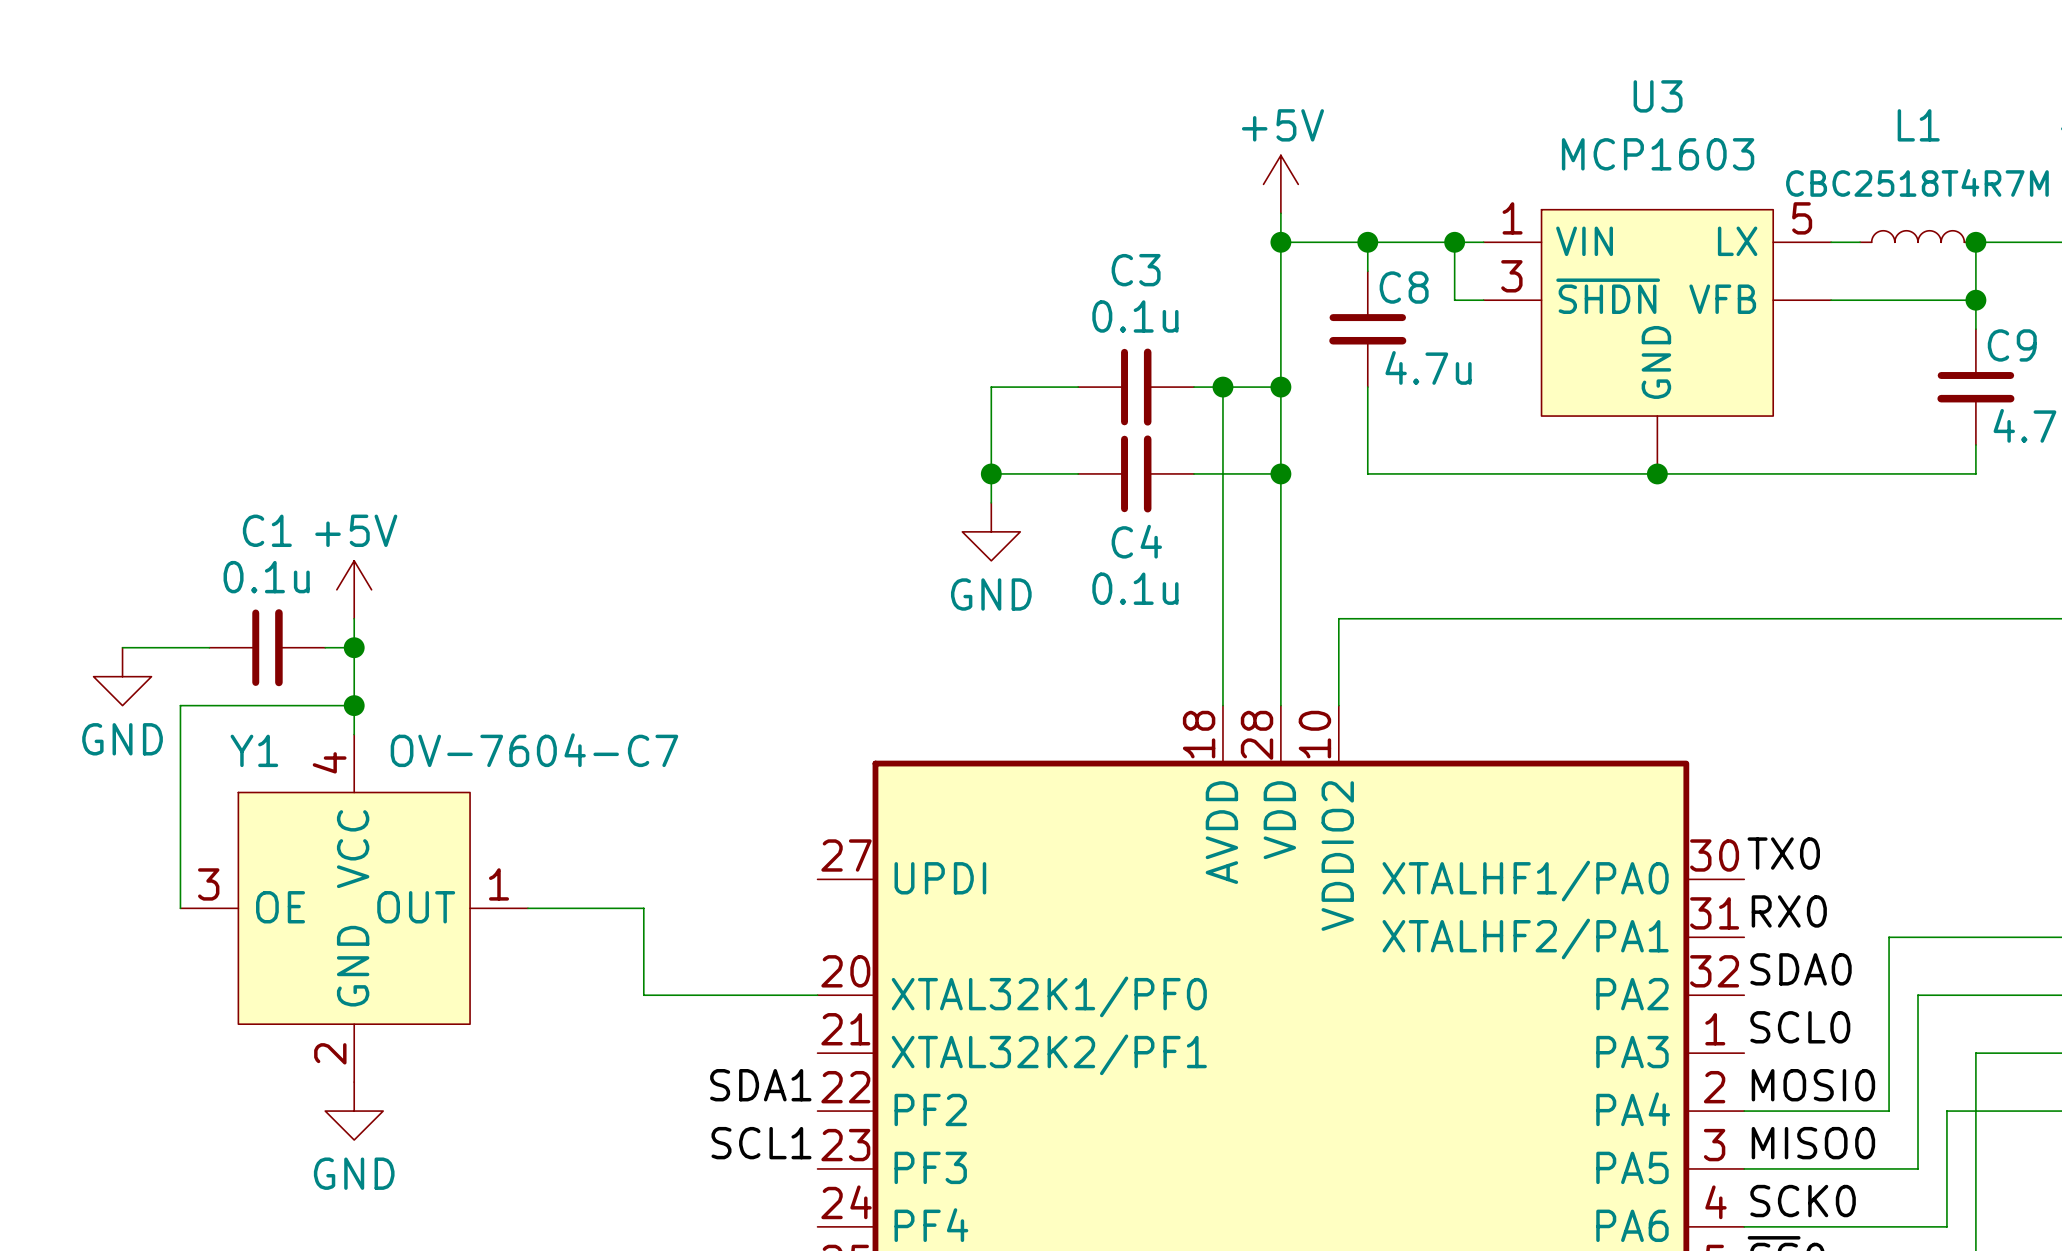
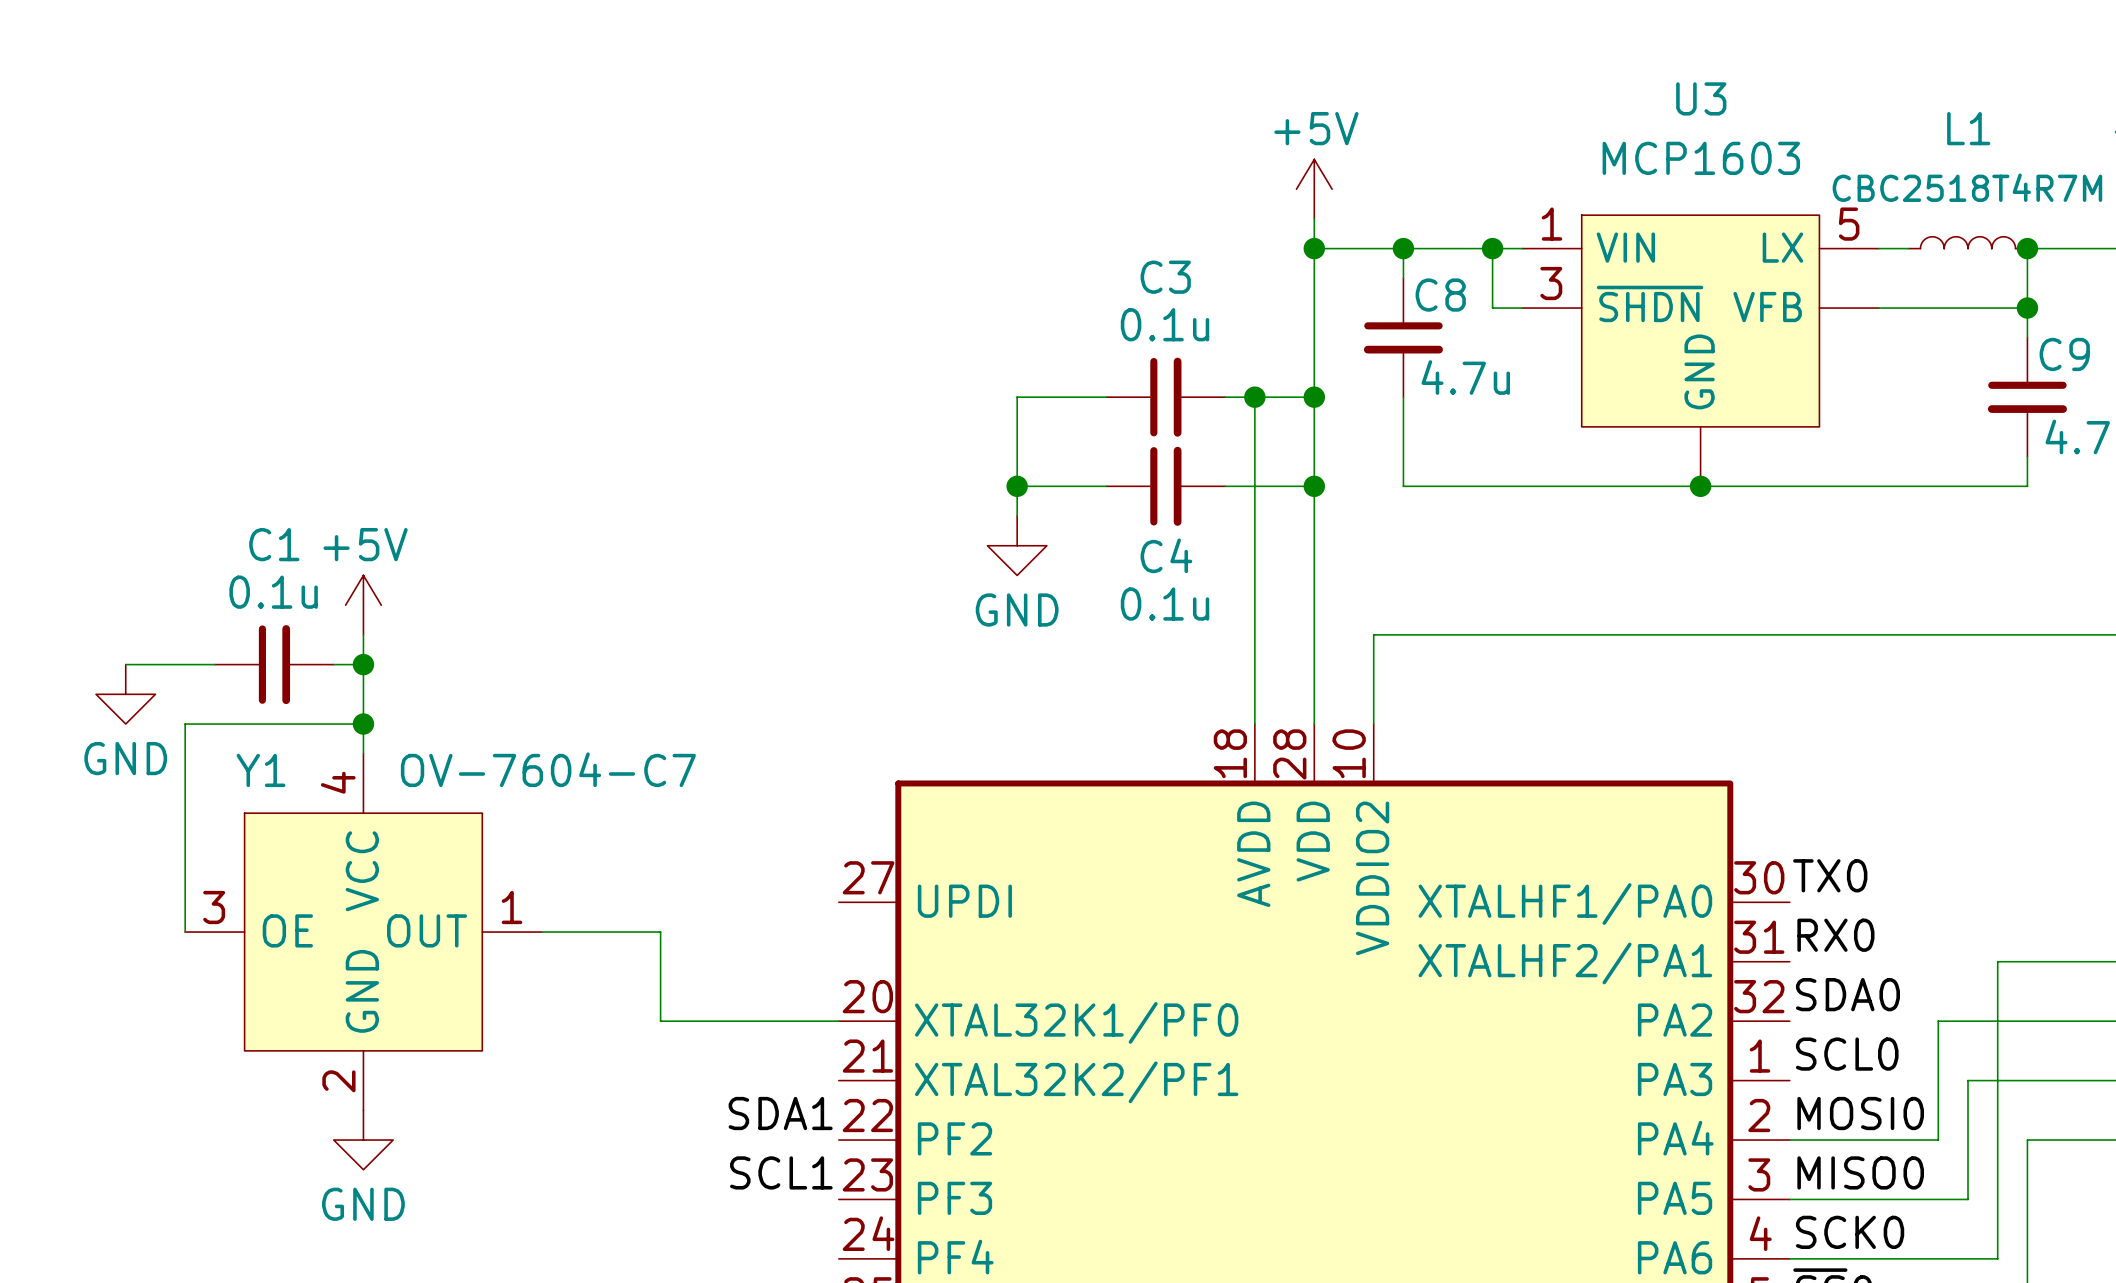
wire: (1946, 937) (1889, 937) (1889, 995) -> (1968, 1021) (1938, 1021)
wire: none -> (1997, 961) (1997, 1140)
wire: (1918, 995) (1918, 1053) -> none
wire: (1975, 1053) (1975, 1111) (1946, 1111) -> (2027, 1080) (1968, 1080)

